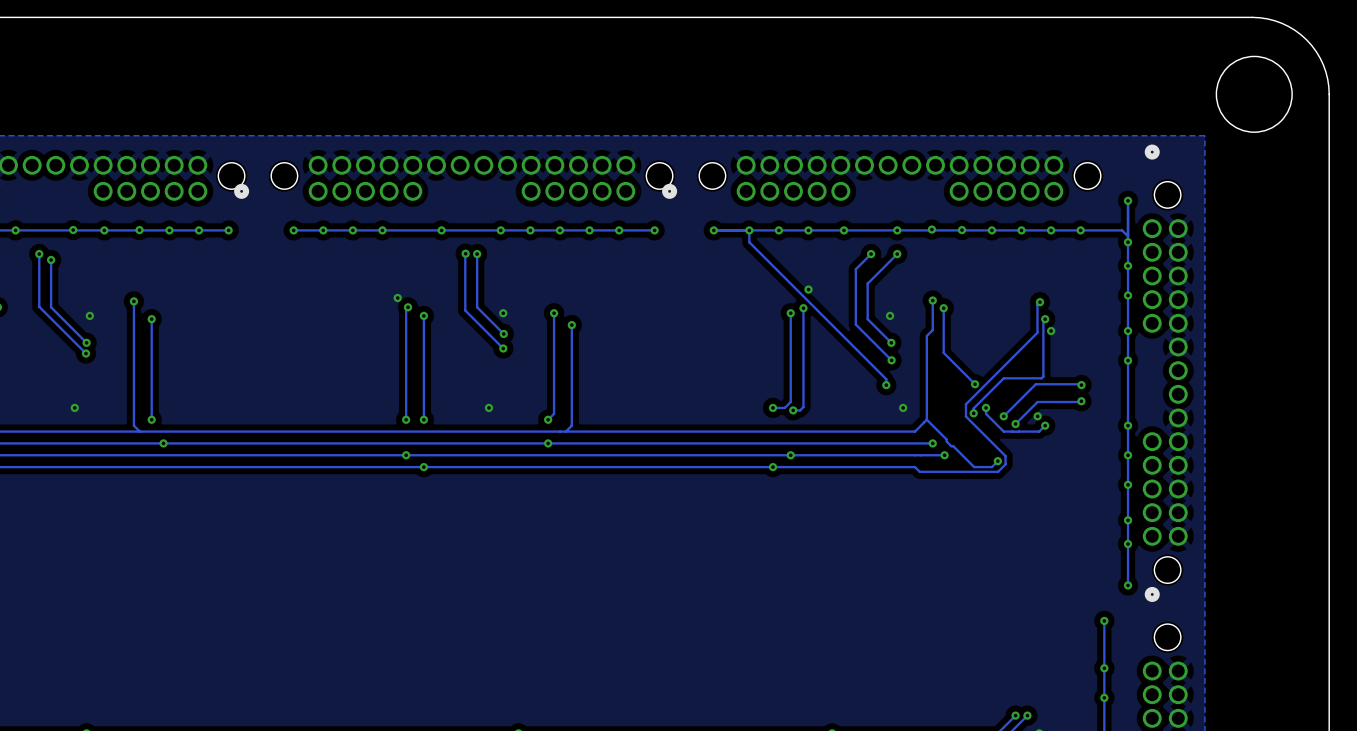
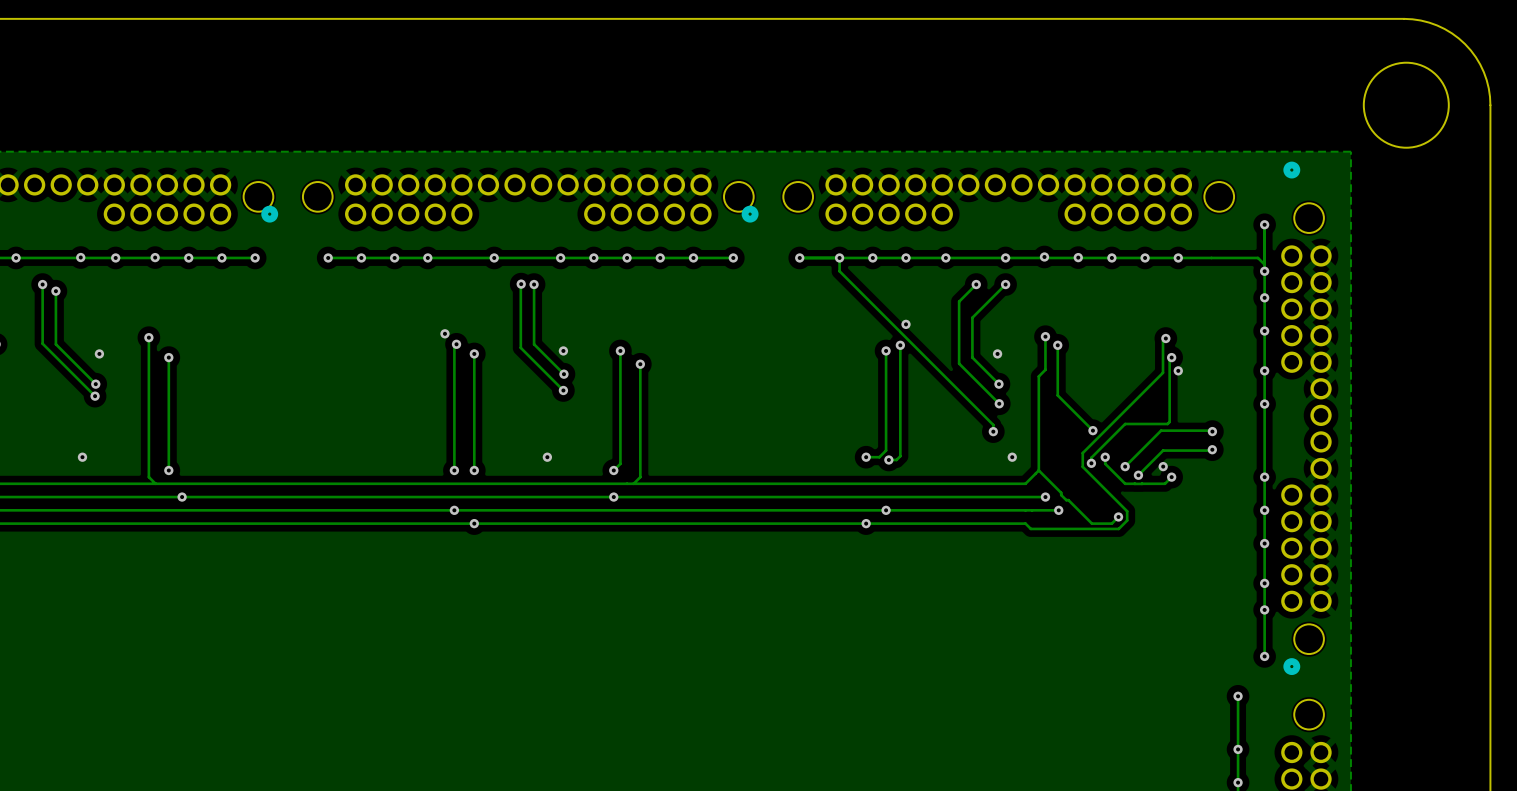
via: (1080, 230) -> none

